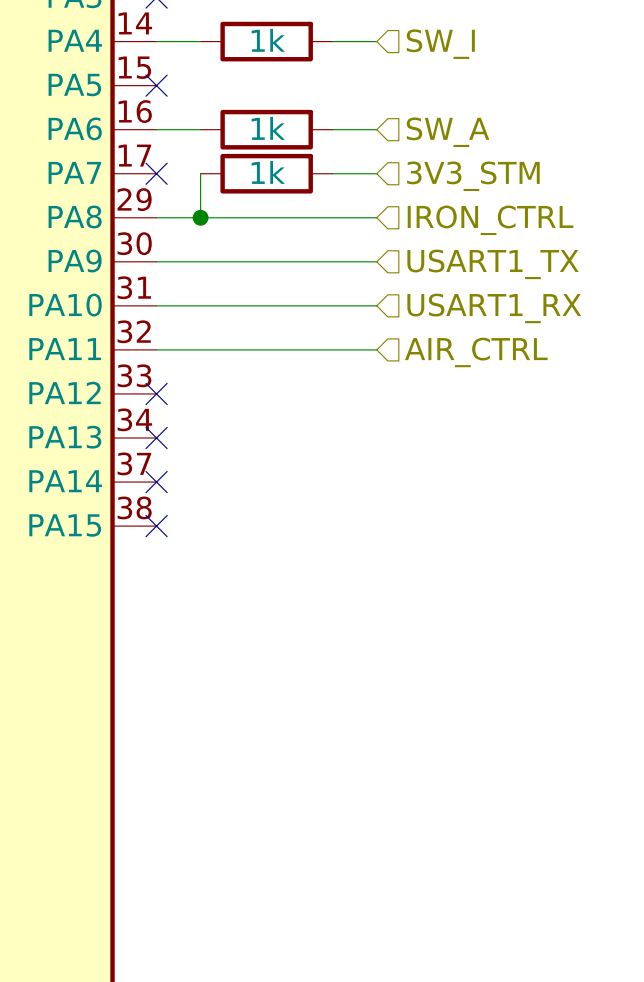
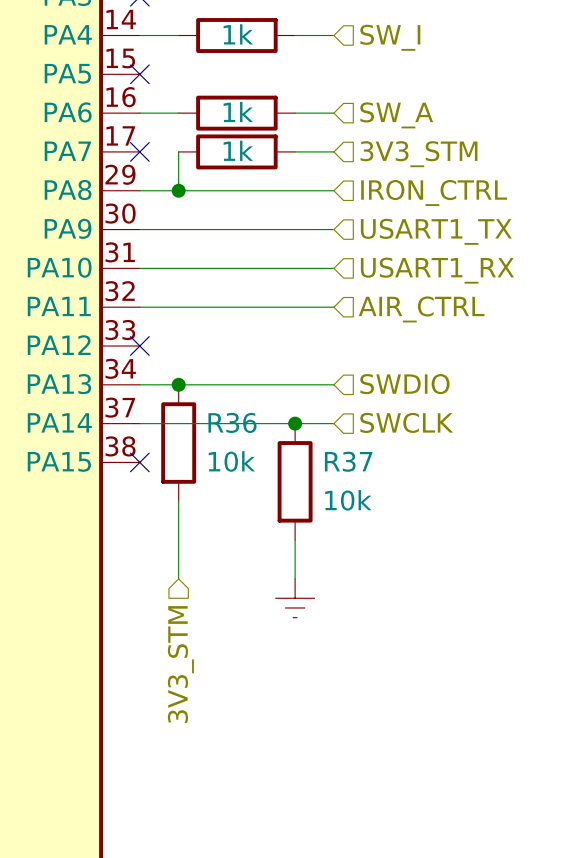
hierarchical label: none -> SWDIO (404, 384)
wire: none -> (139, 384) (333, 384)
no-connect mark: (156, 438) -> none
junction: none -> (178, 384)
hierarchical label: none -> SWCLK (406, 422)
wire: none -> (139, 423) (333, 423)
no-connect mark: (156, 482) -> none
junction: none -> (295, 423)
R36: none -> 10k (178, 443)
R37: none -> 10k (295, 481)
wire: none -> (178, 501) (178, 578)
wire: none -> (295, 540) (295, 578)
power symbol: none -> (295, 598)
hierarchical label: none -> 3V3_STM (180, 664)

